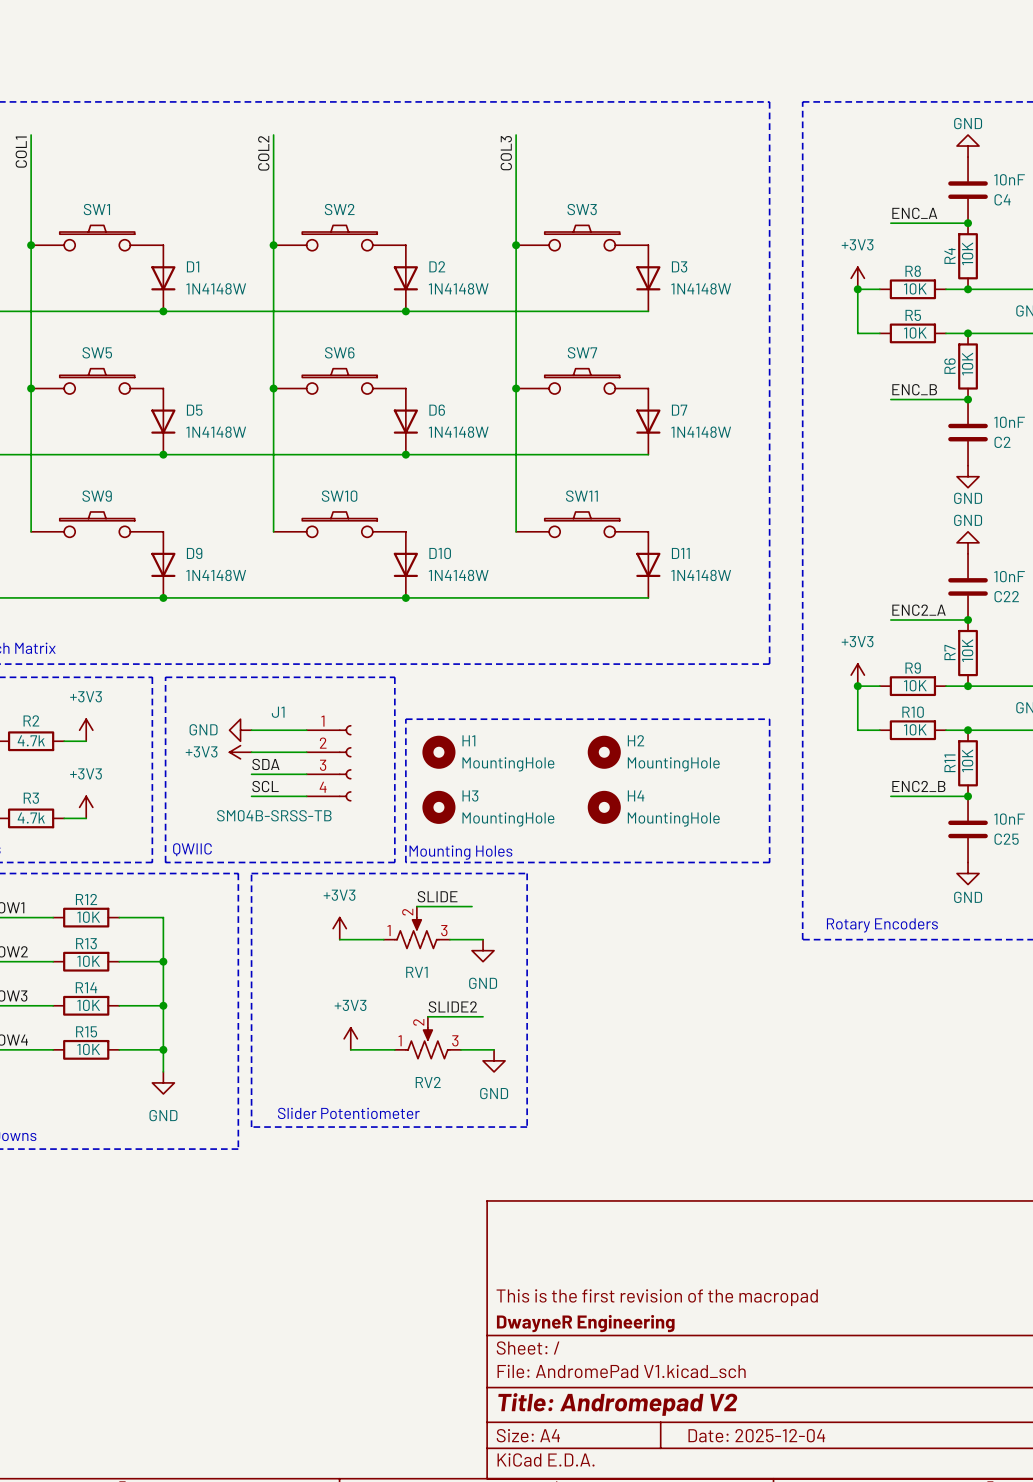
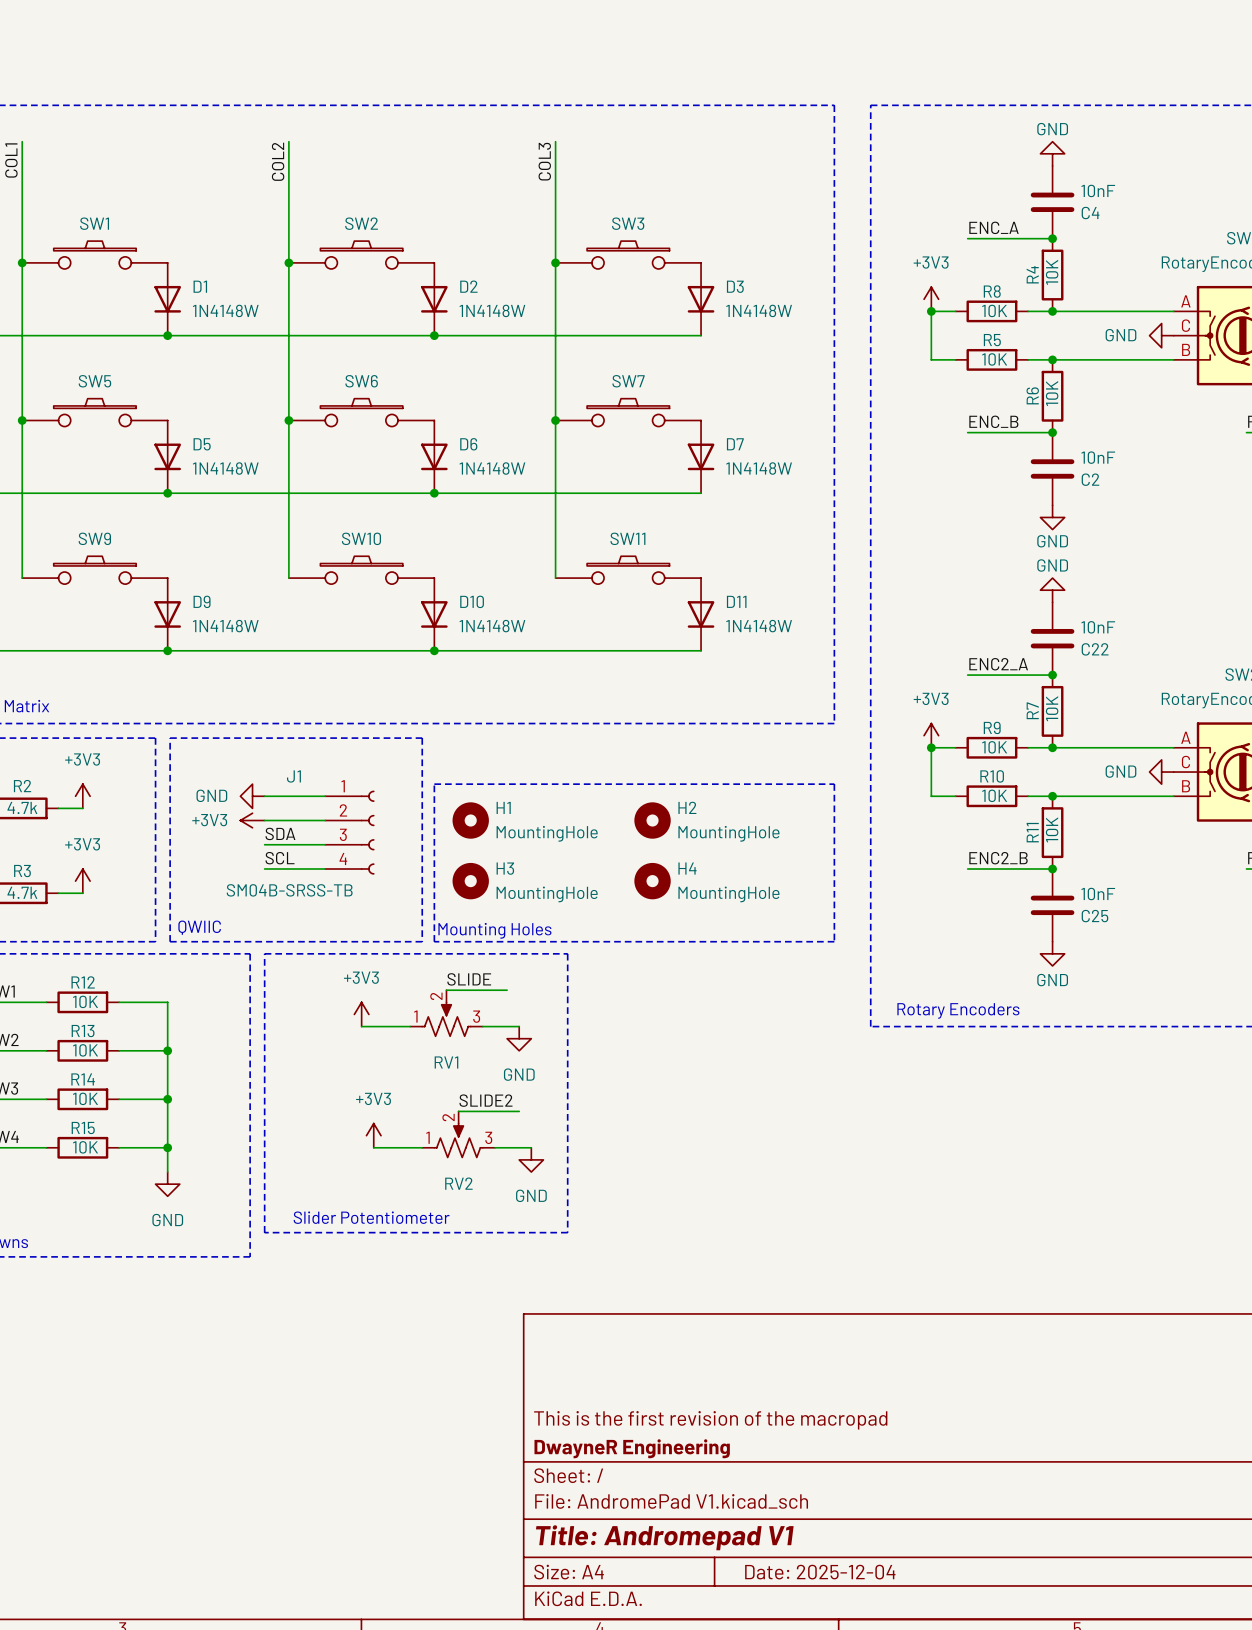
title block: Title: Andromepad V2 (617, 1404) -> Title: Andromepad V1 (664, 1537)

